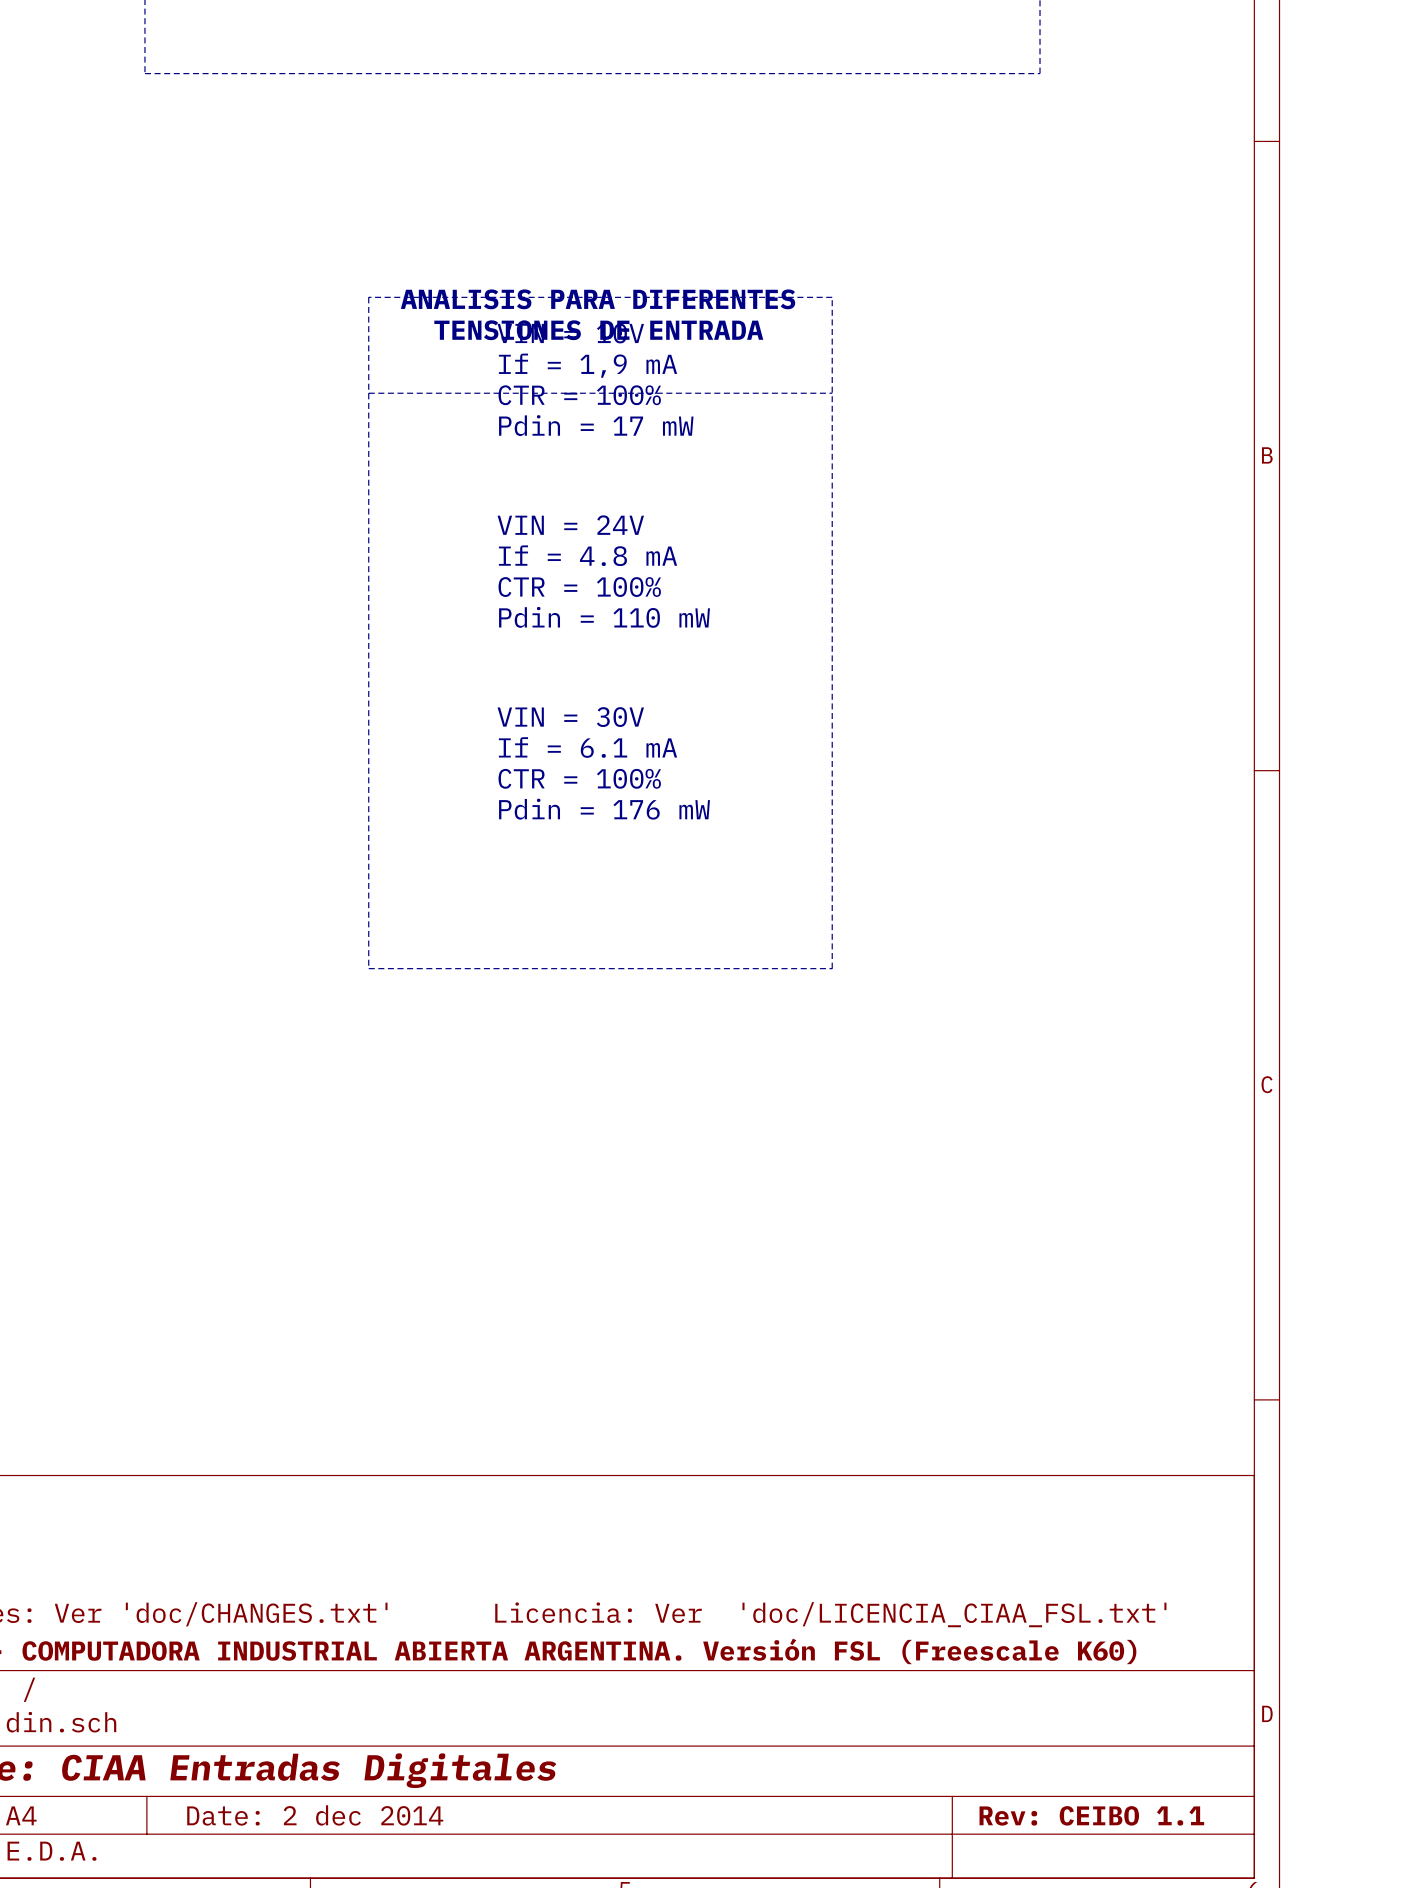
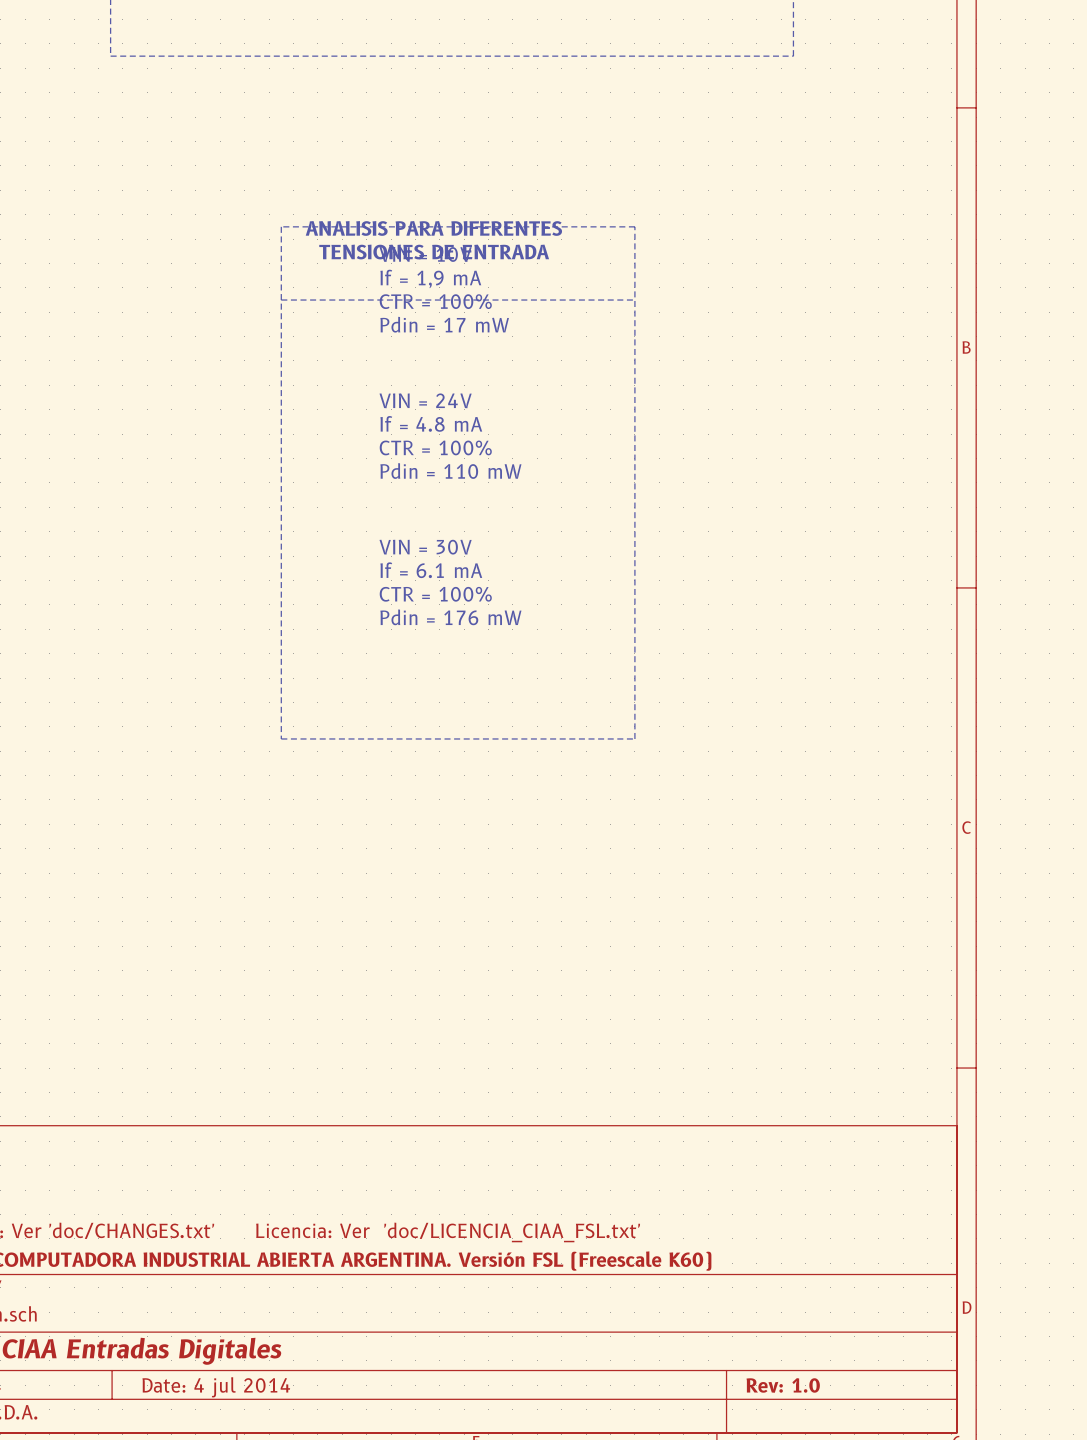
title block: Date: 2 dec 2014 (315, 1815) -> Date: 4 jul 2014 (216, 1387)
title block: Rev: CEIBO 1.1 (1091, 1815) -> Rev: 1.0 (783, 1385)

